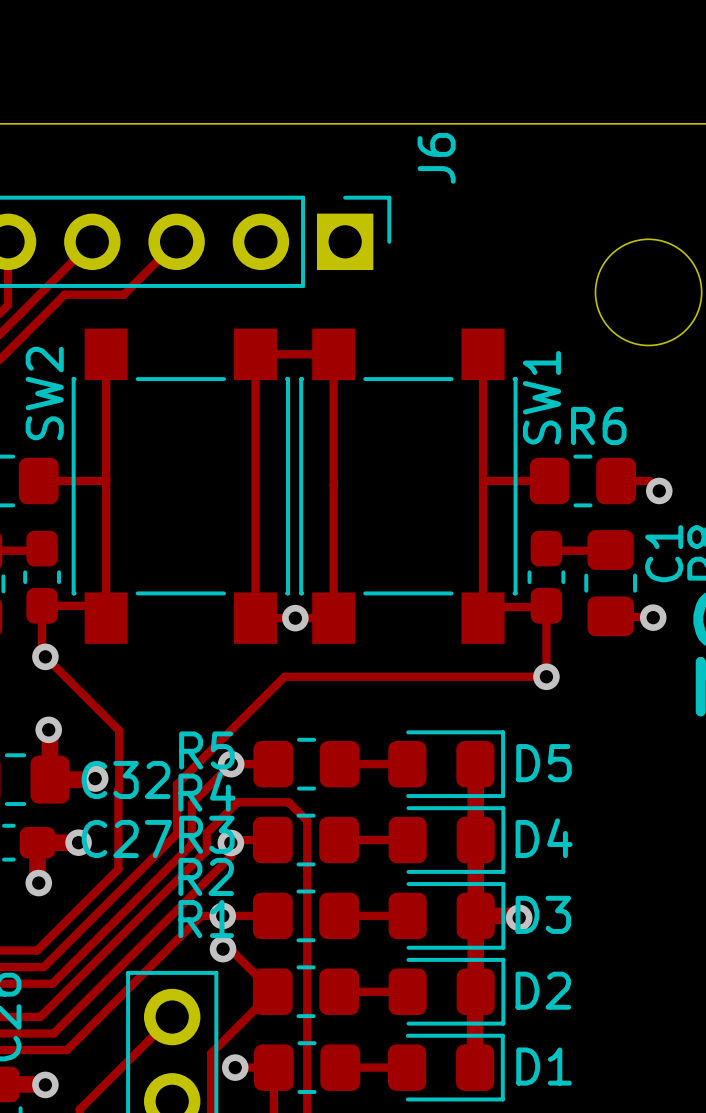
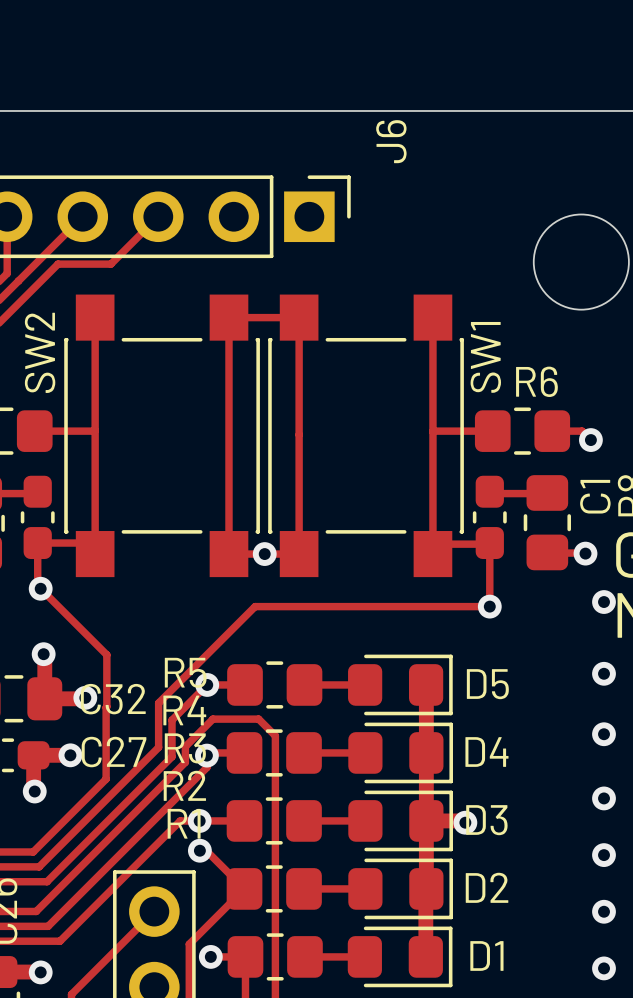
via: none -> (604, 602)
via: none -> (604, 673)
via: none -> (604, 734)
via: none -> (604, 798)
via: none -> (604, 855)
via: none -> (604, 911)
via: none -> (604, 968)

